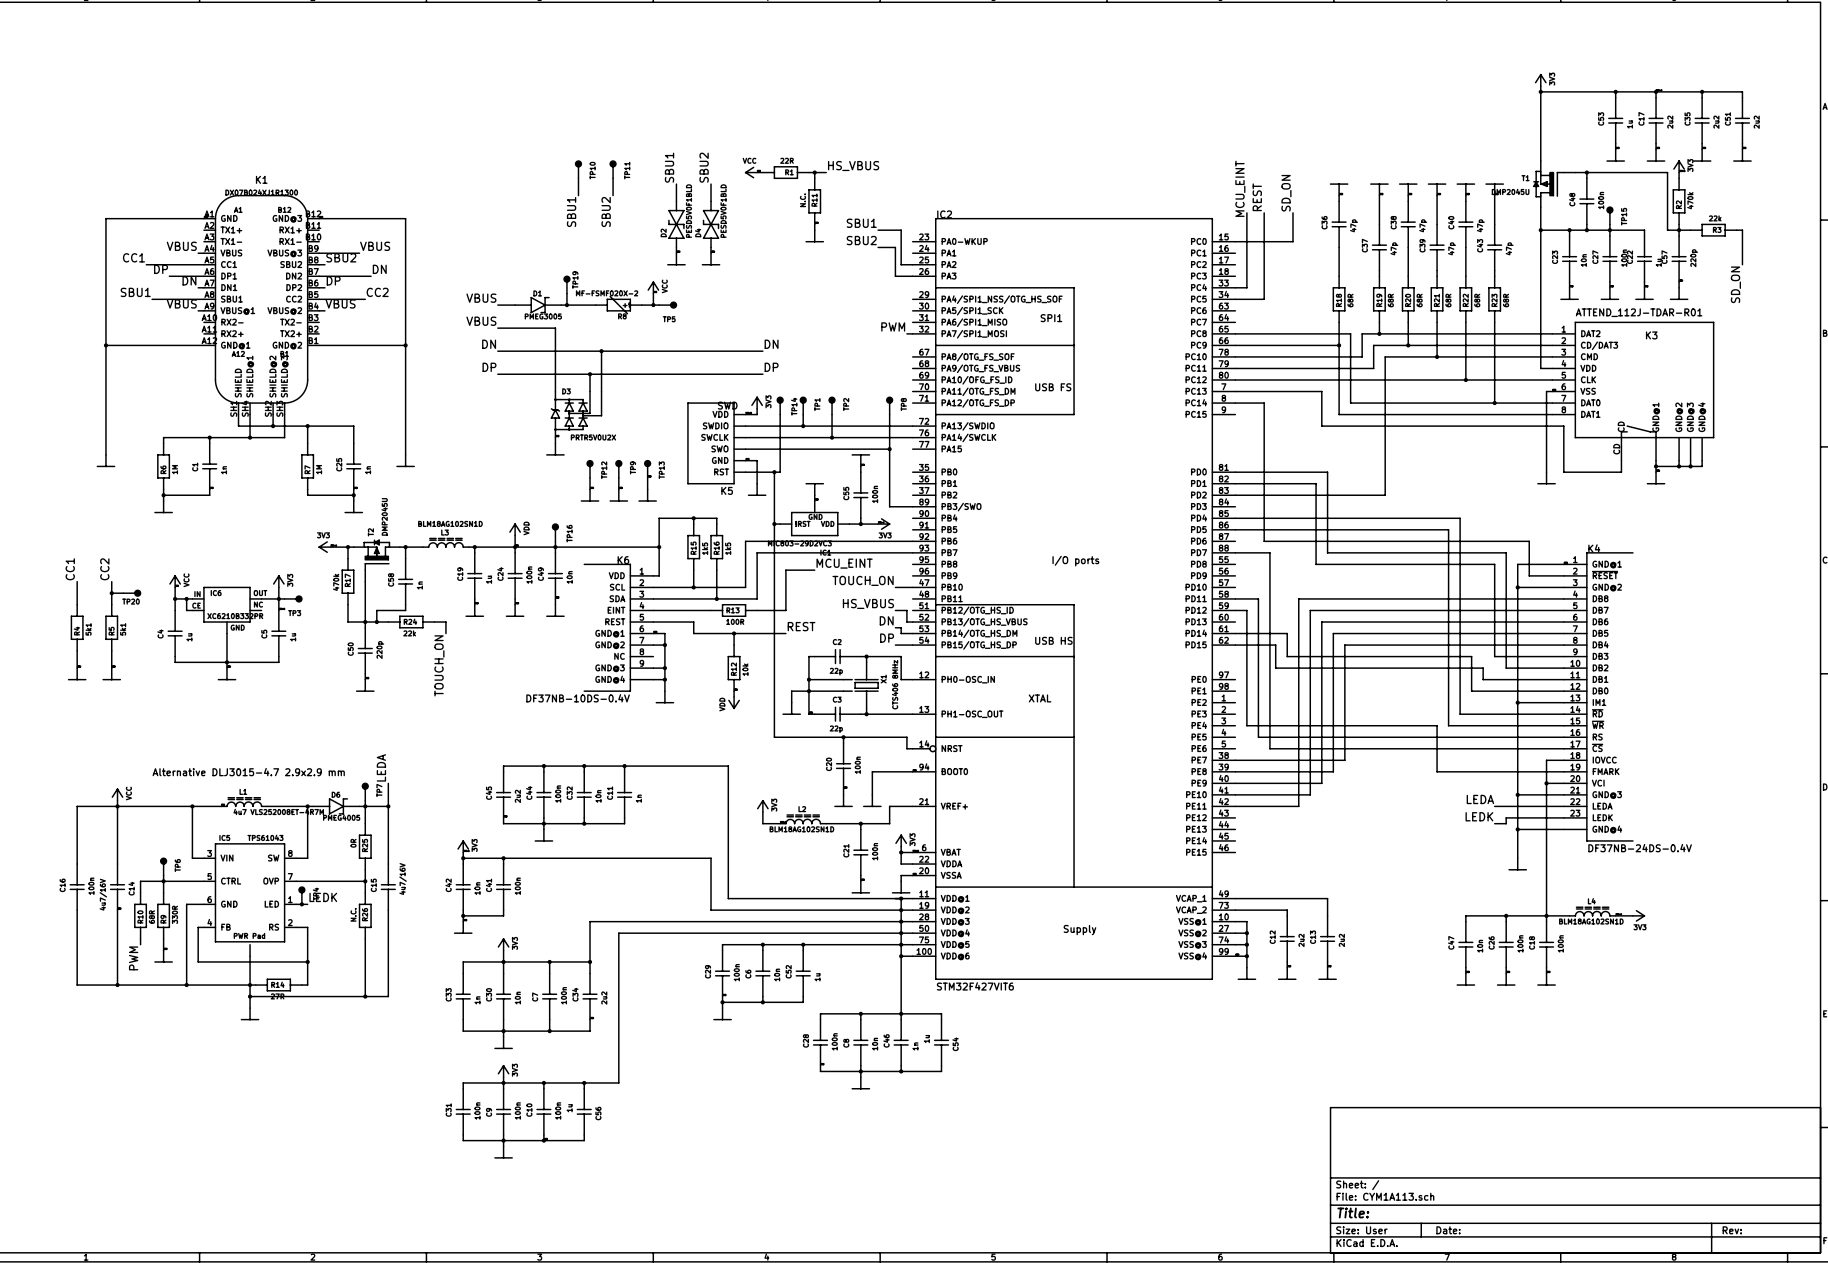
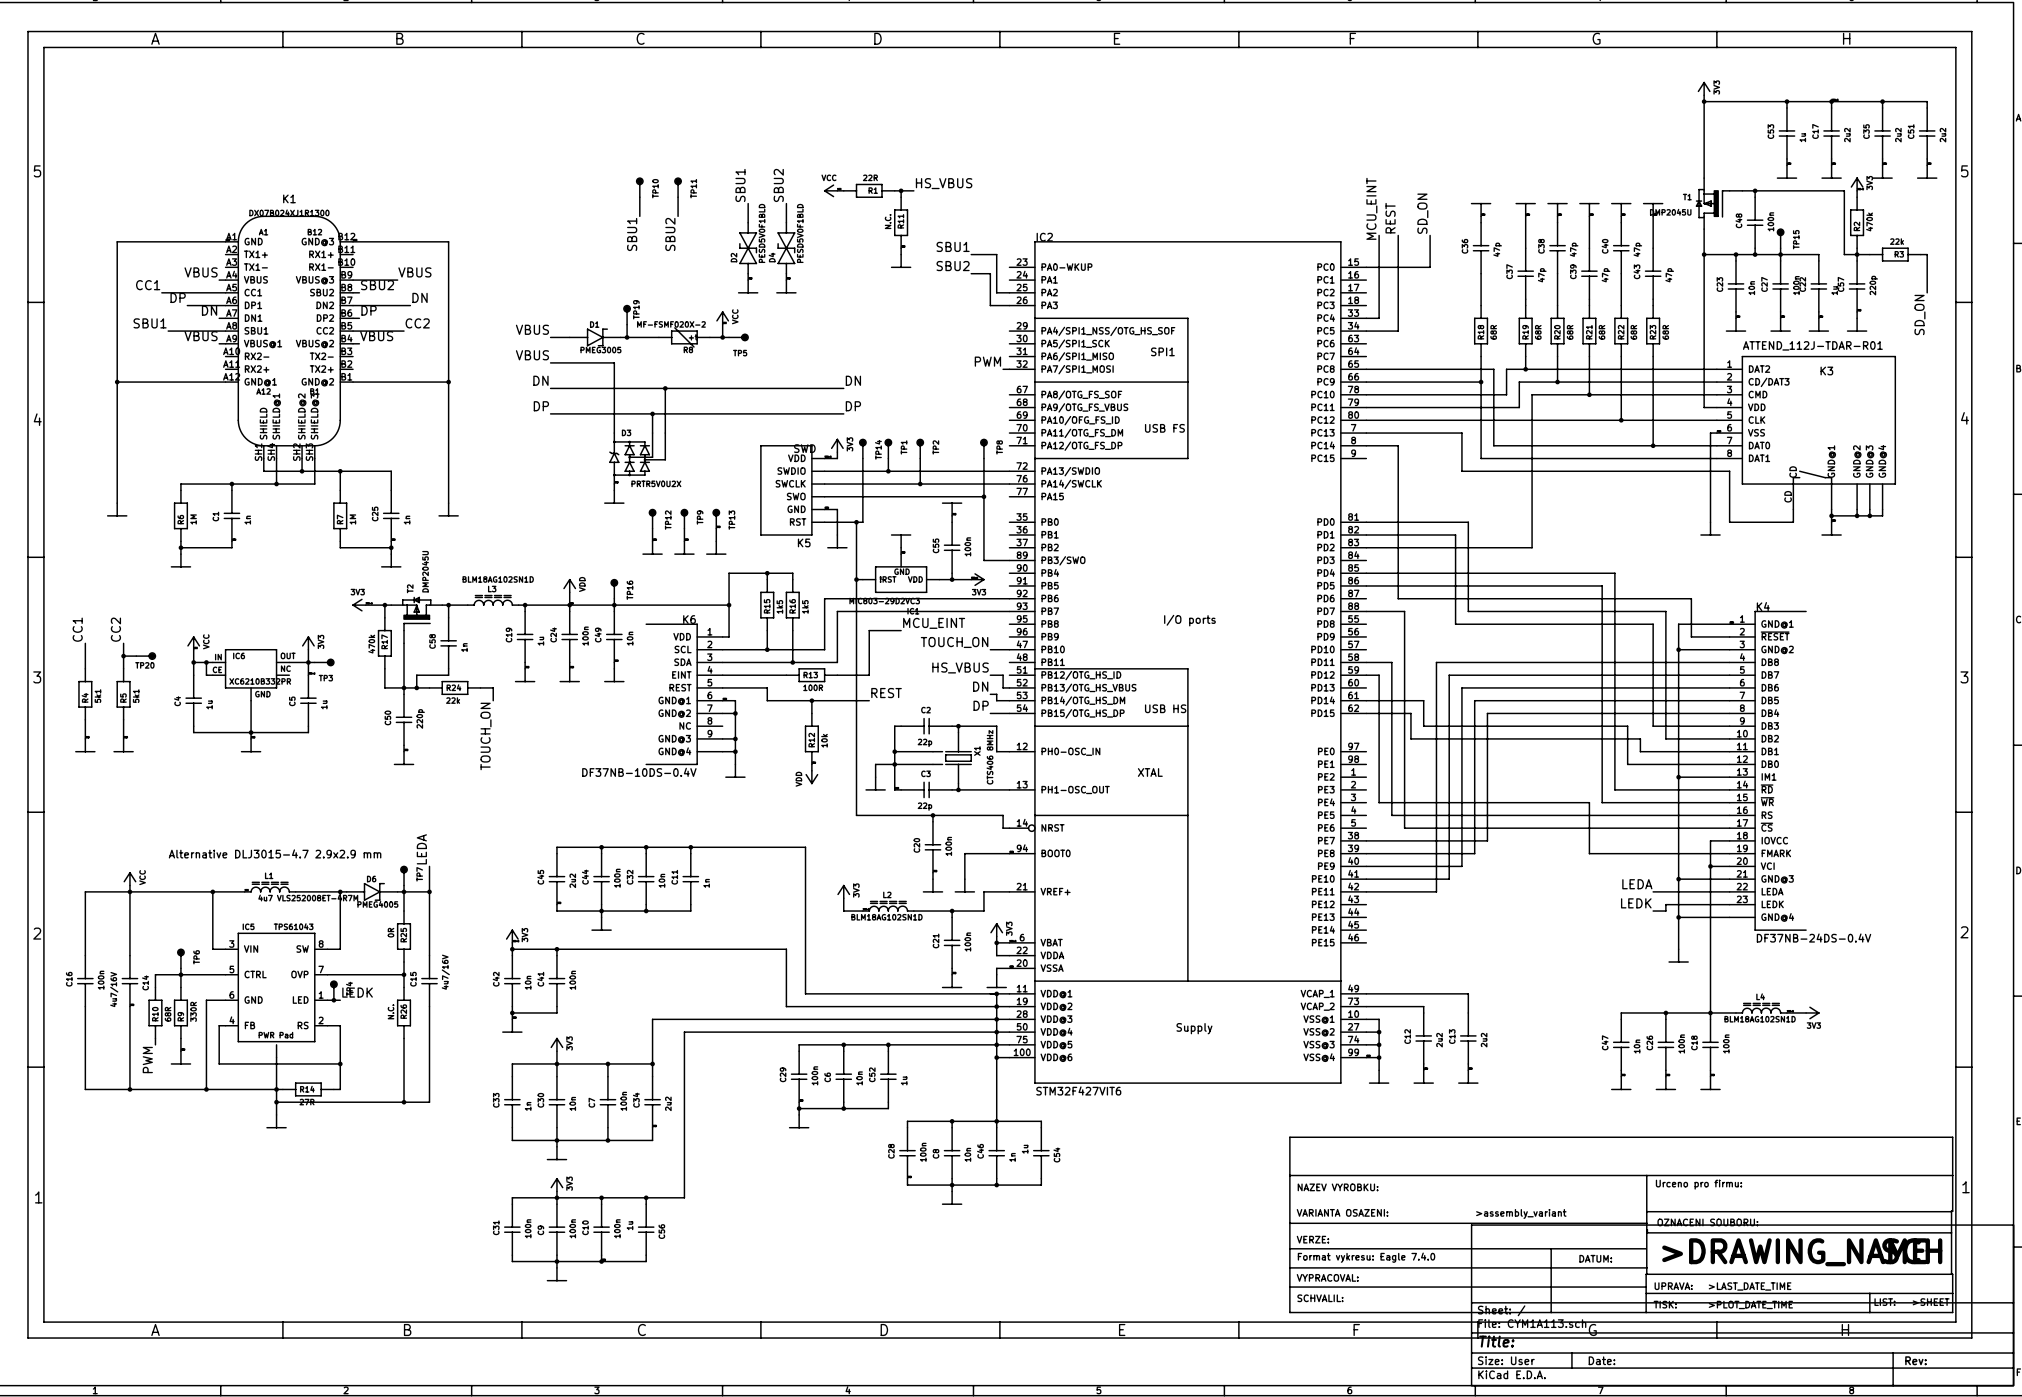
drawing: none -> [27, 31, 1972, 1339]

